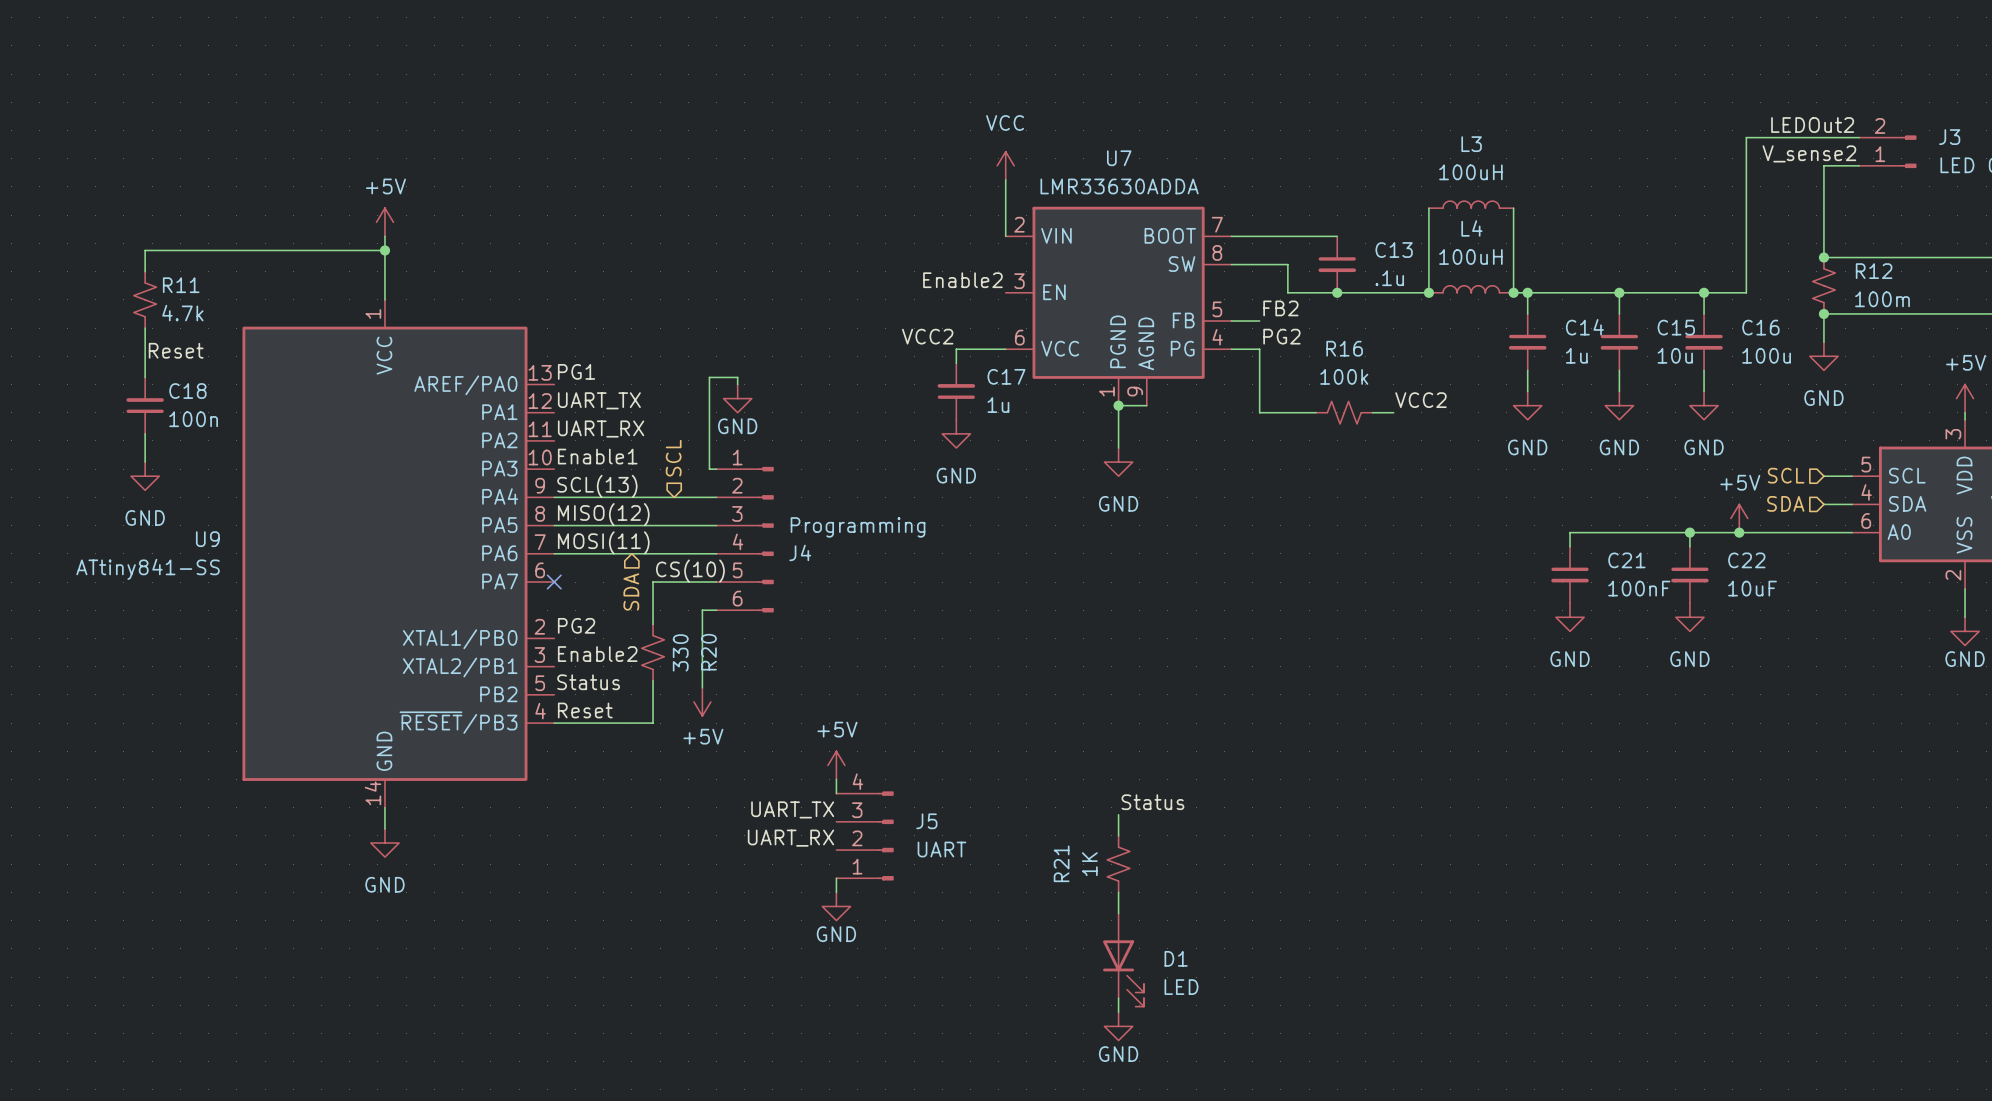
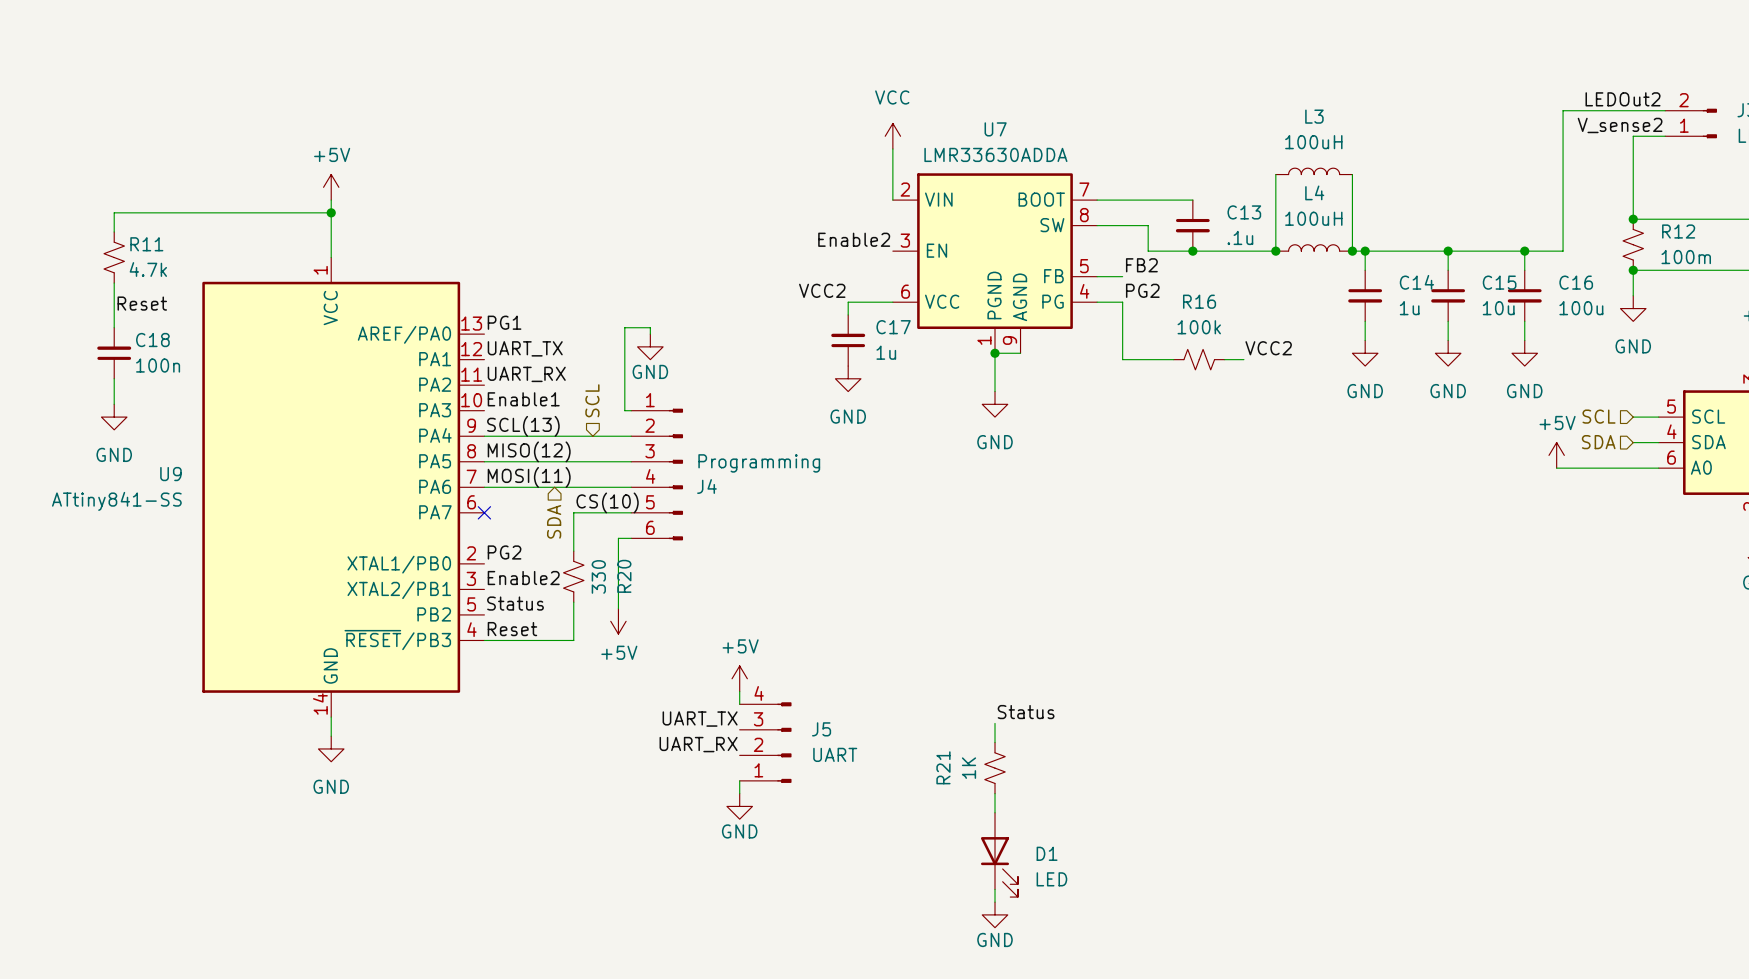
wire: (1689, 532) (1689, 546) -> none
junction: (1689, 532) -> none
wire: (1739, 532) (1570, 532) (1570, 546) -> none
junction: (1739, 532) -> none
C21: 100nF (1570, 574) -> none
C22: 10uF (1689, 574) -> none
power symbol: GND (1570, 617) -> none
power symbol: GND (1689, 617) -> none

